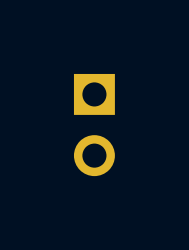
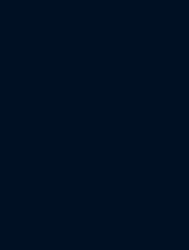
part: (94, 125) -> none

